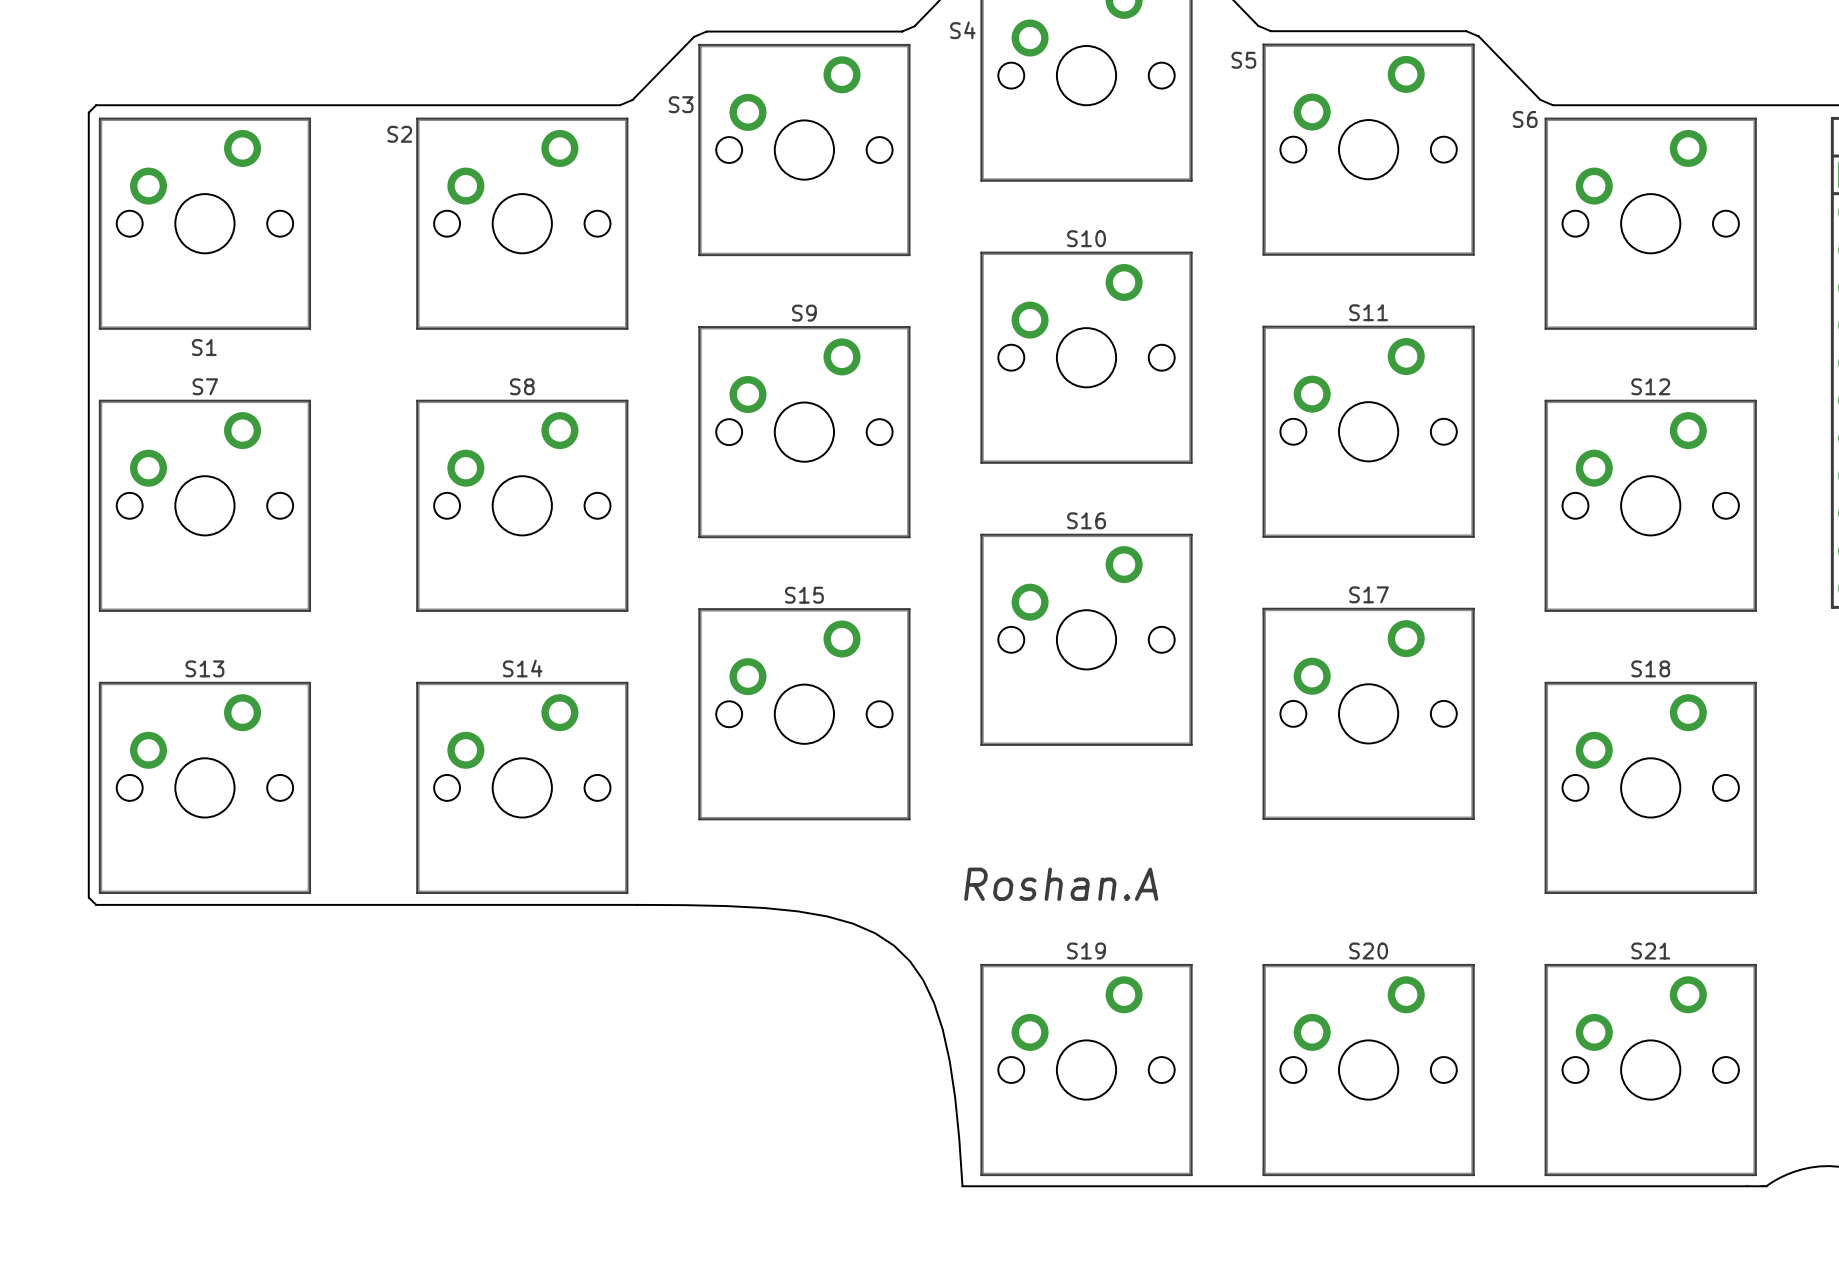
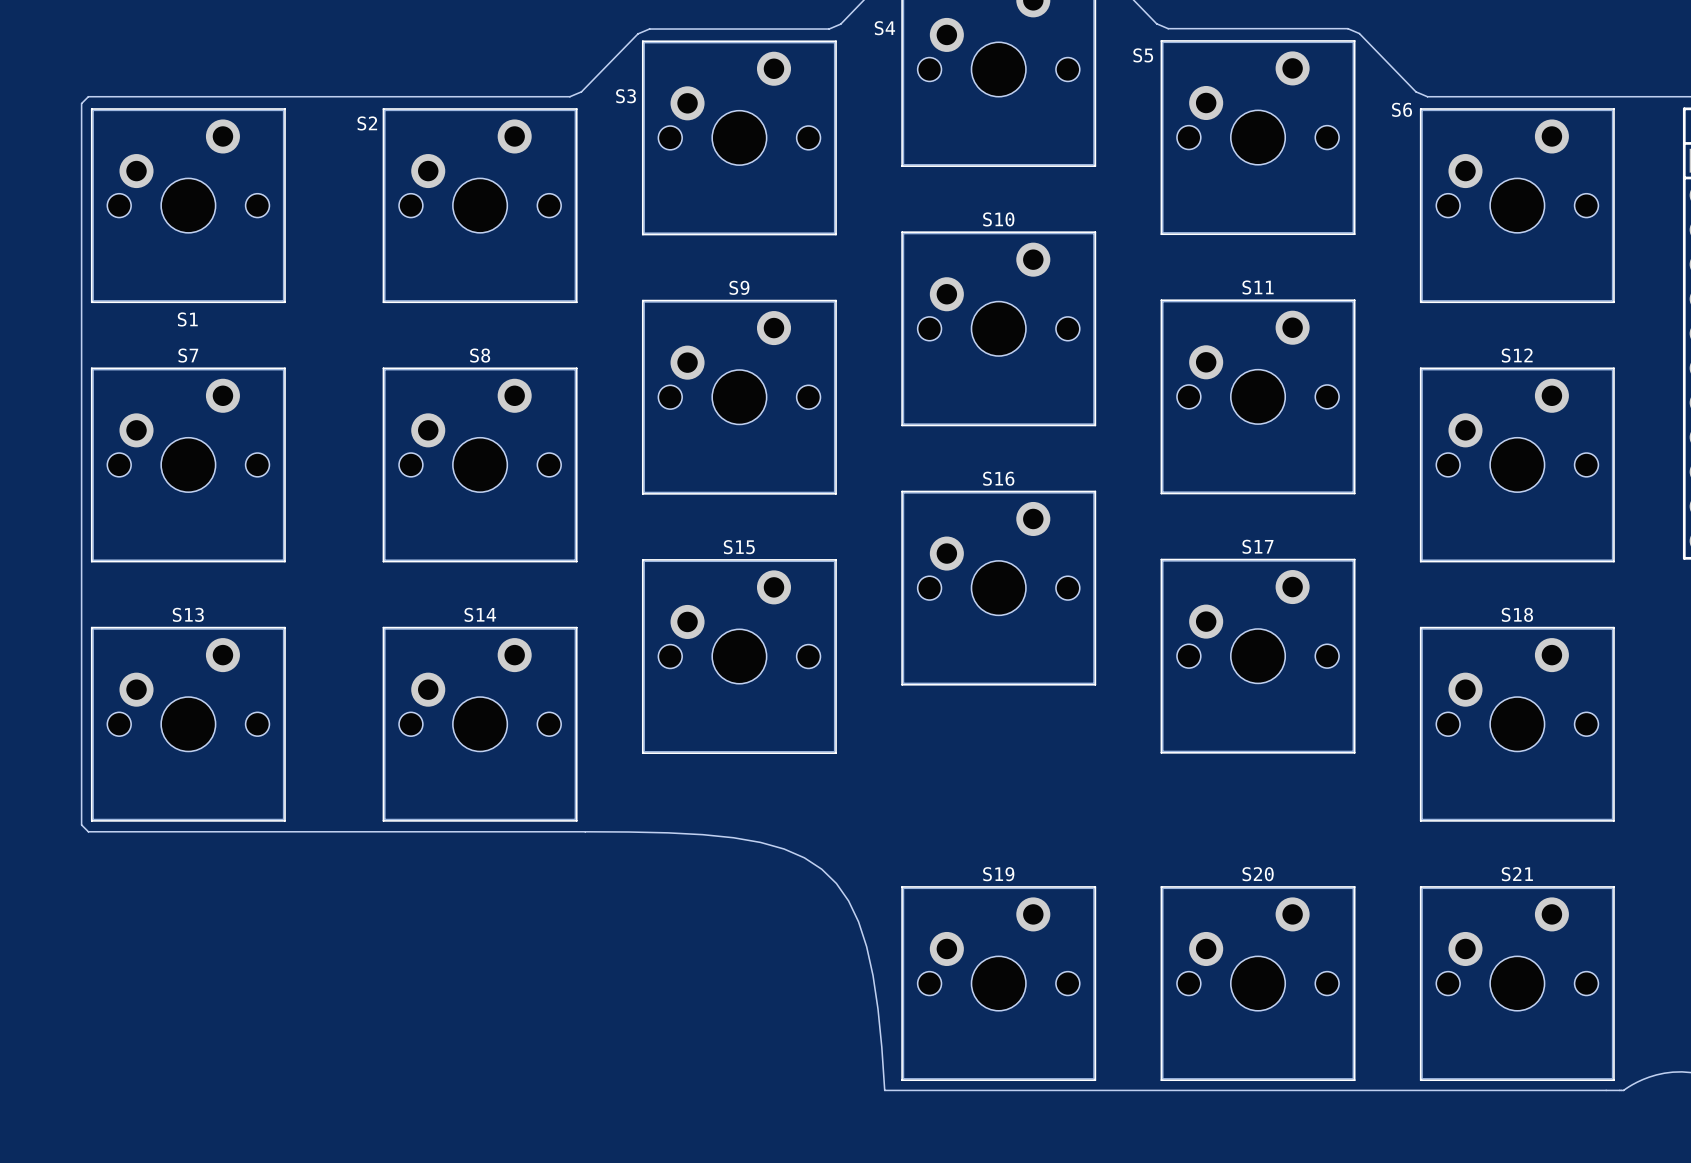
text: Roshan.A (1061, 884) -> none

